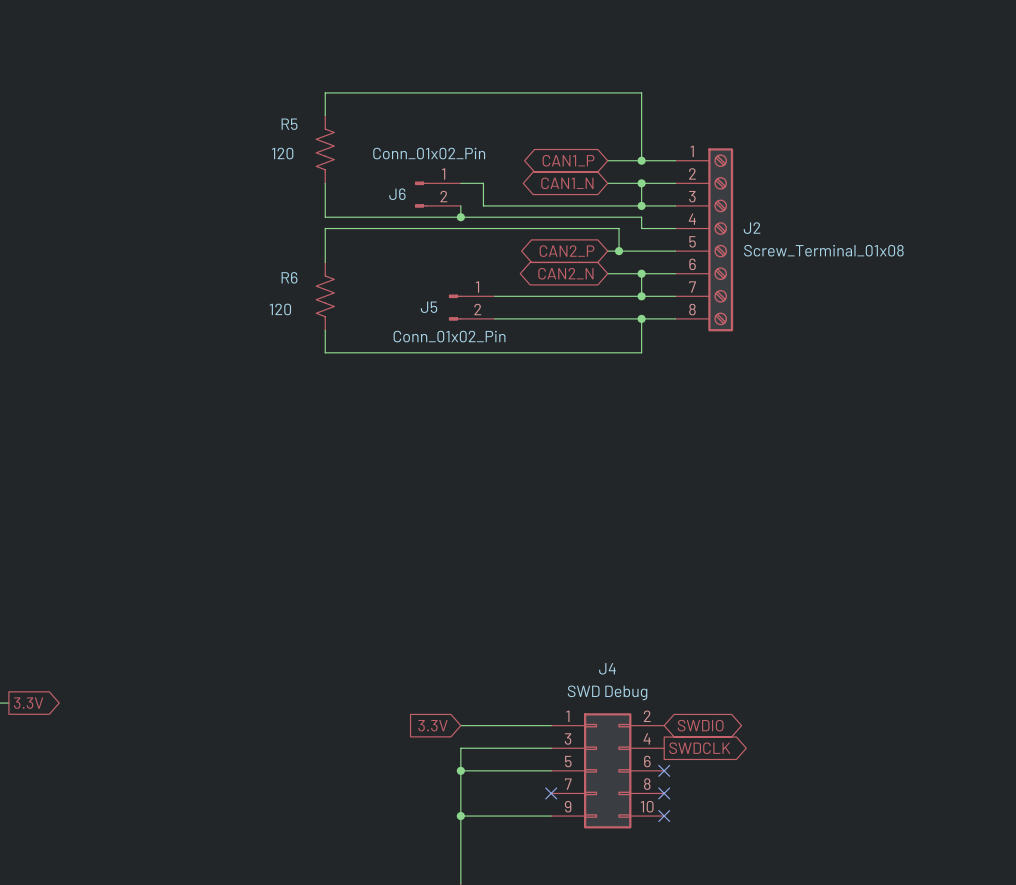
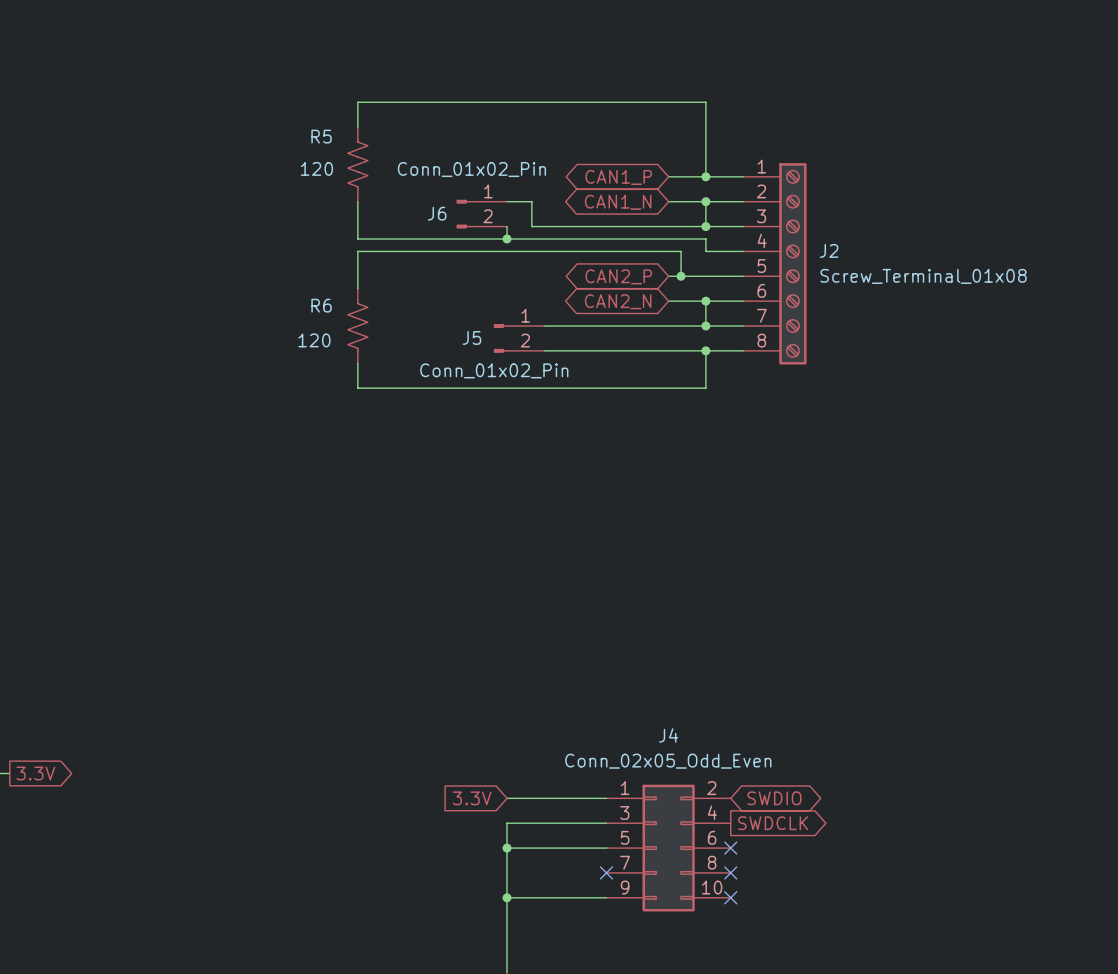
J4 value: SWD Debug (607, 692) -> Conn_02x05_Odd_Even (668, 761)

